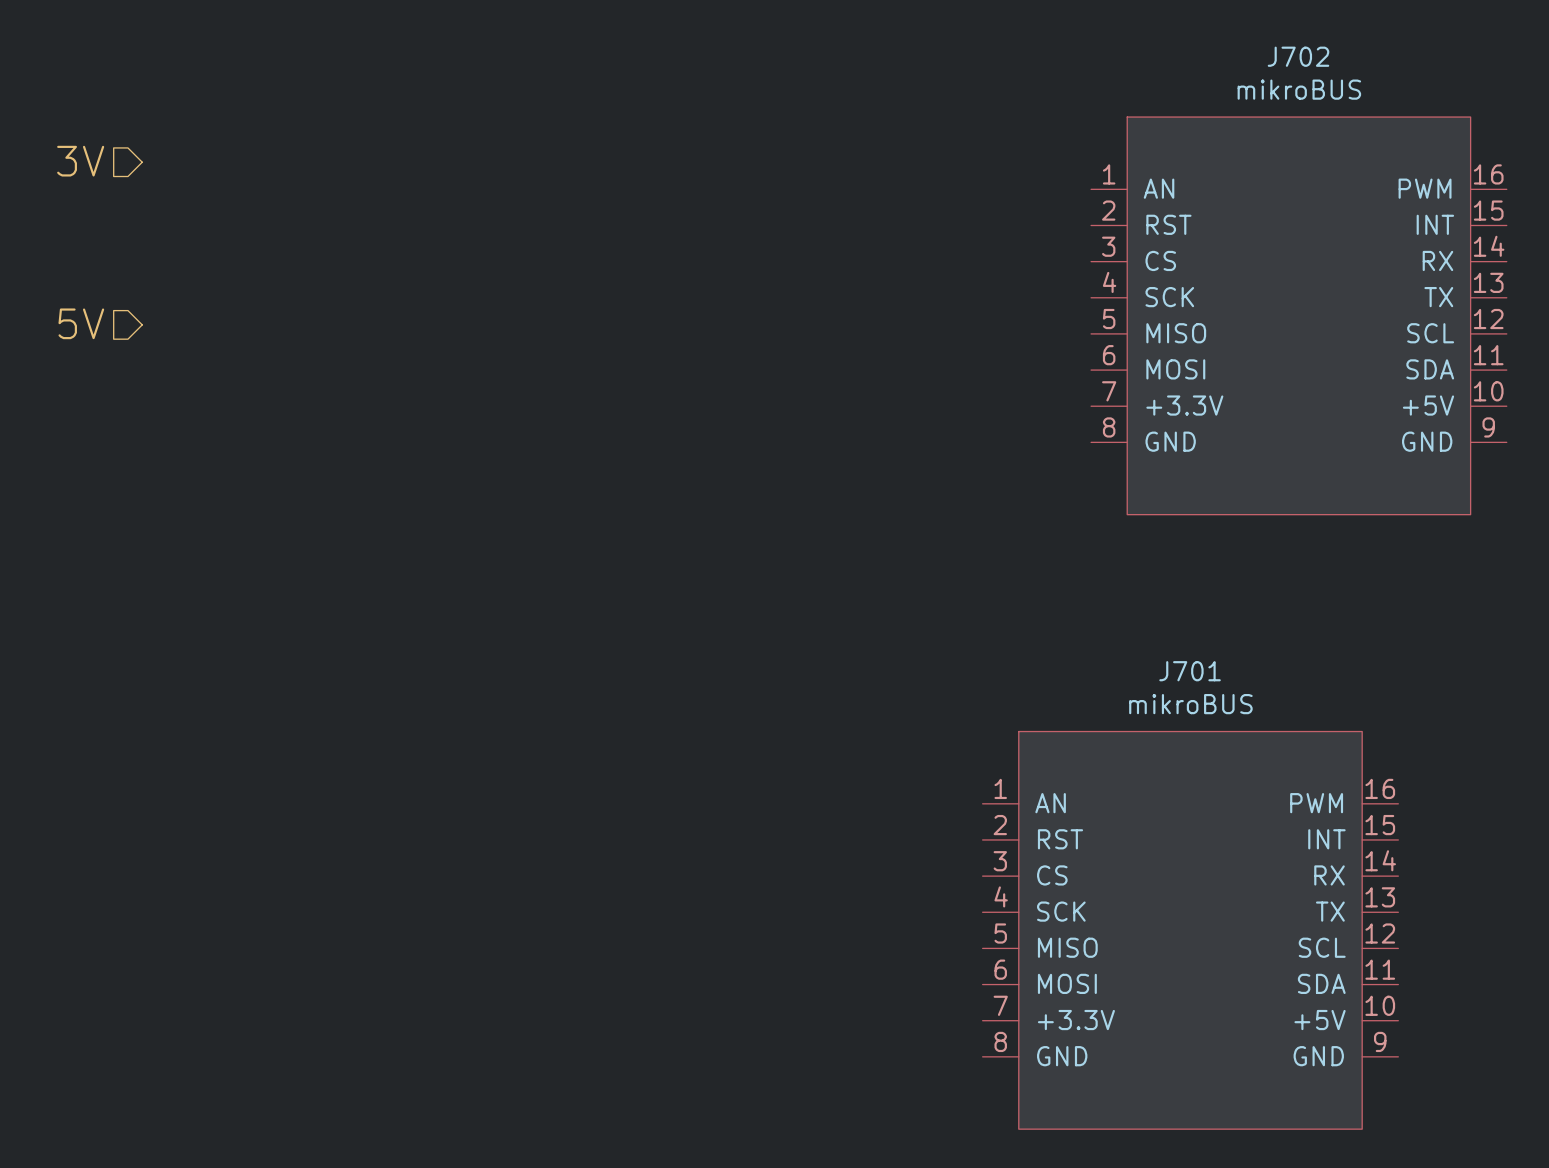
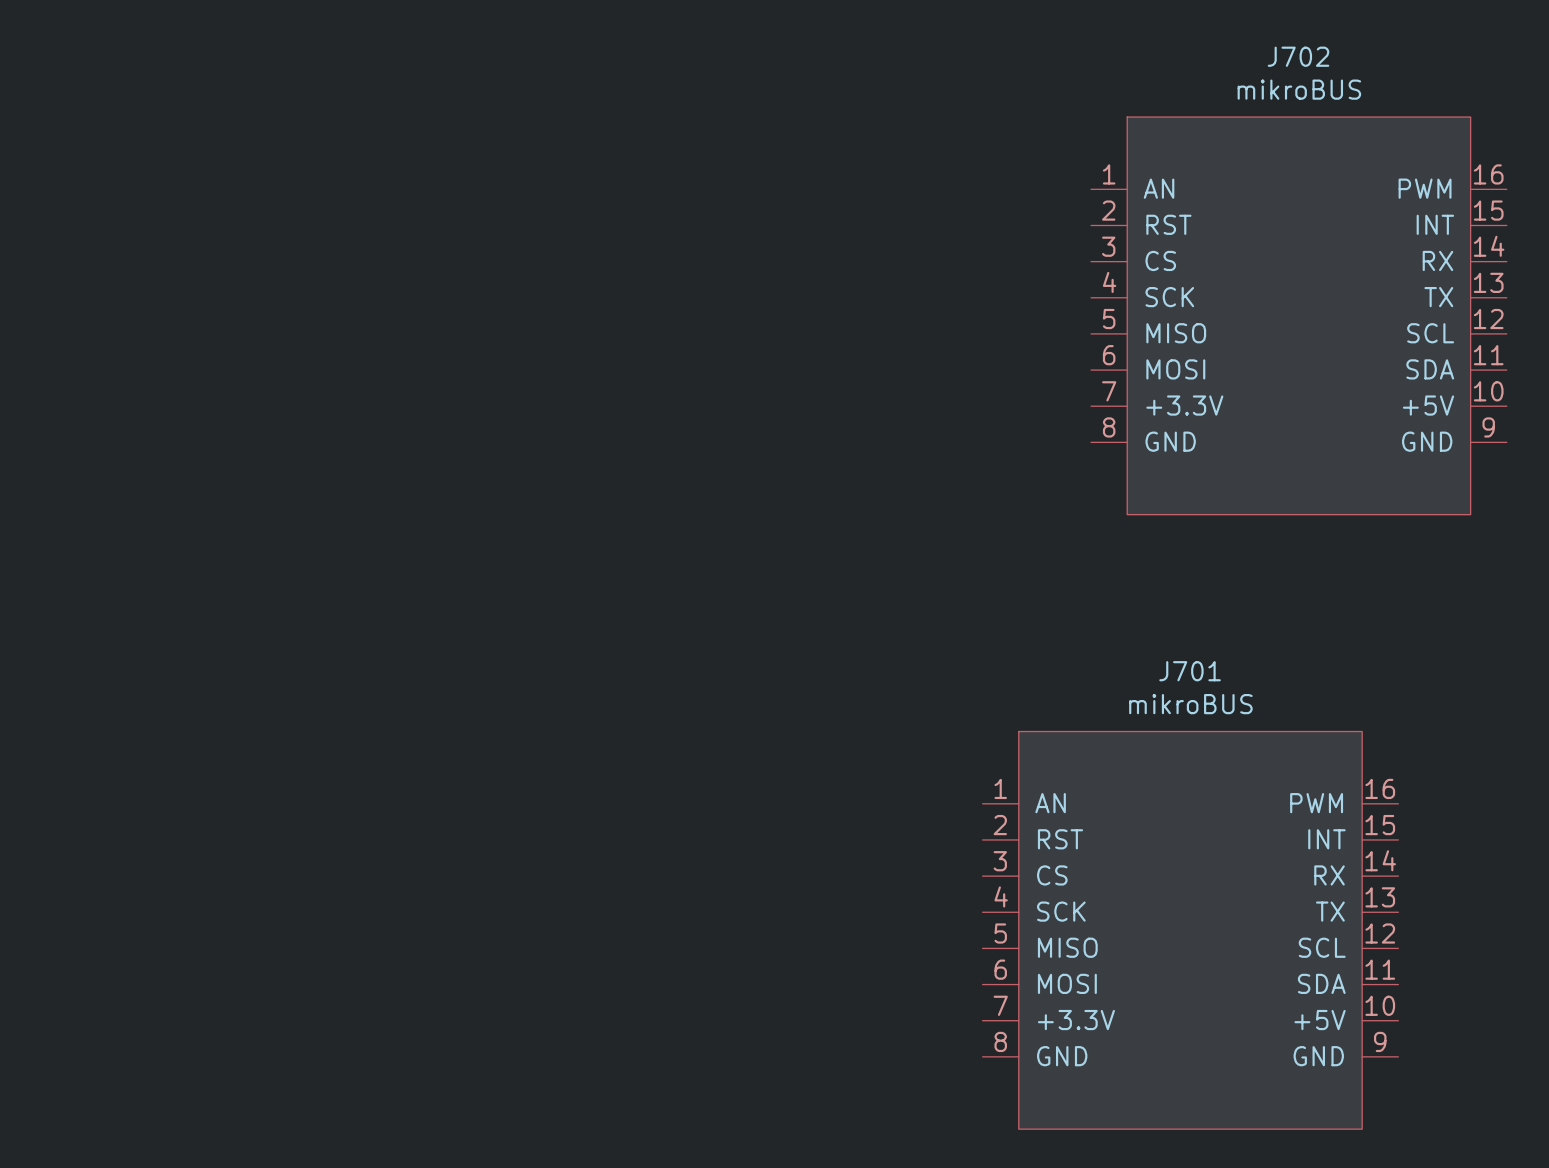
hierarchical label: 3V (80, 161) -> none
hierarchical label: 5V (81, 323) -> none

